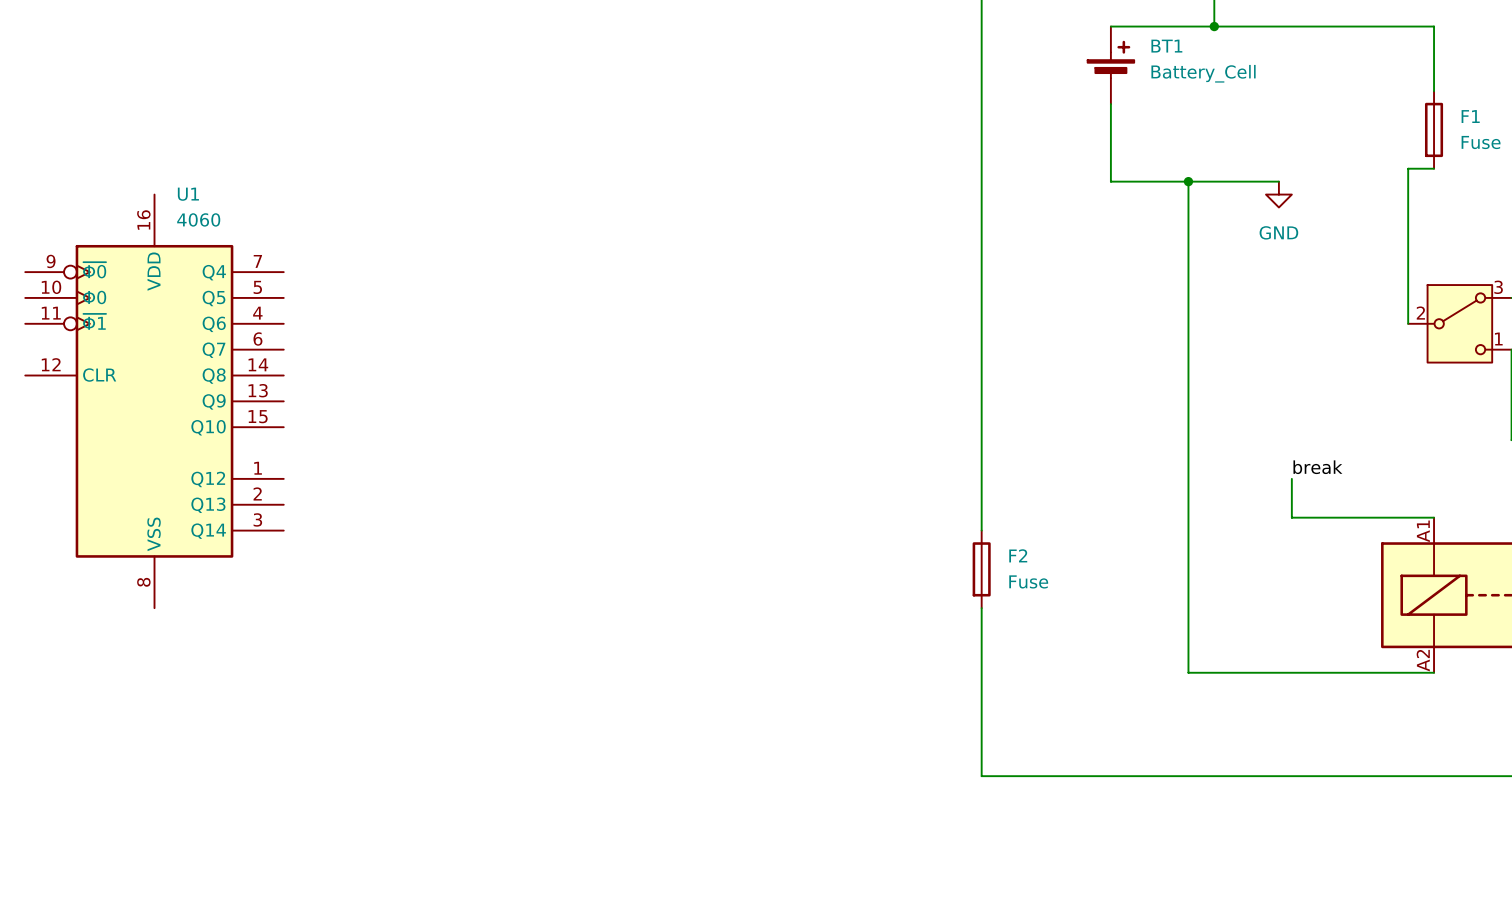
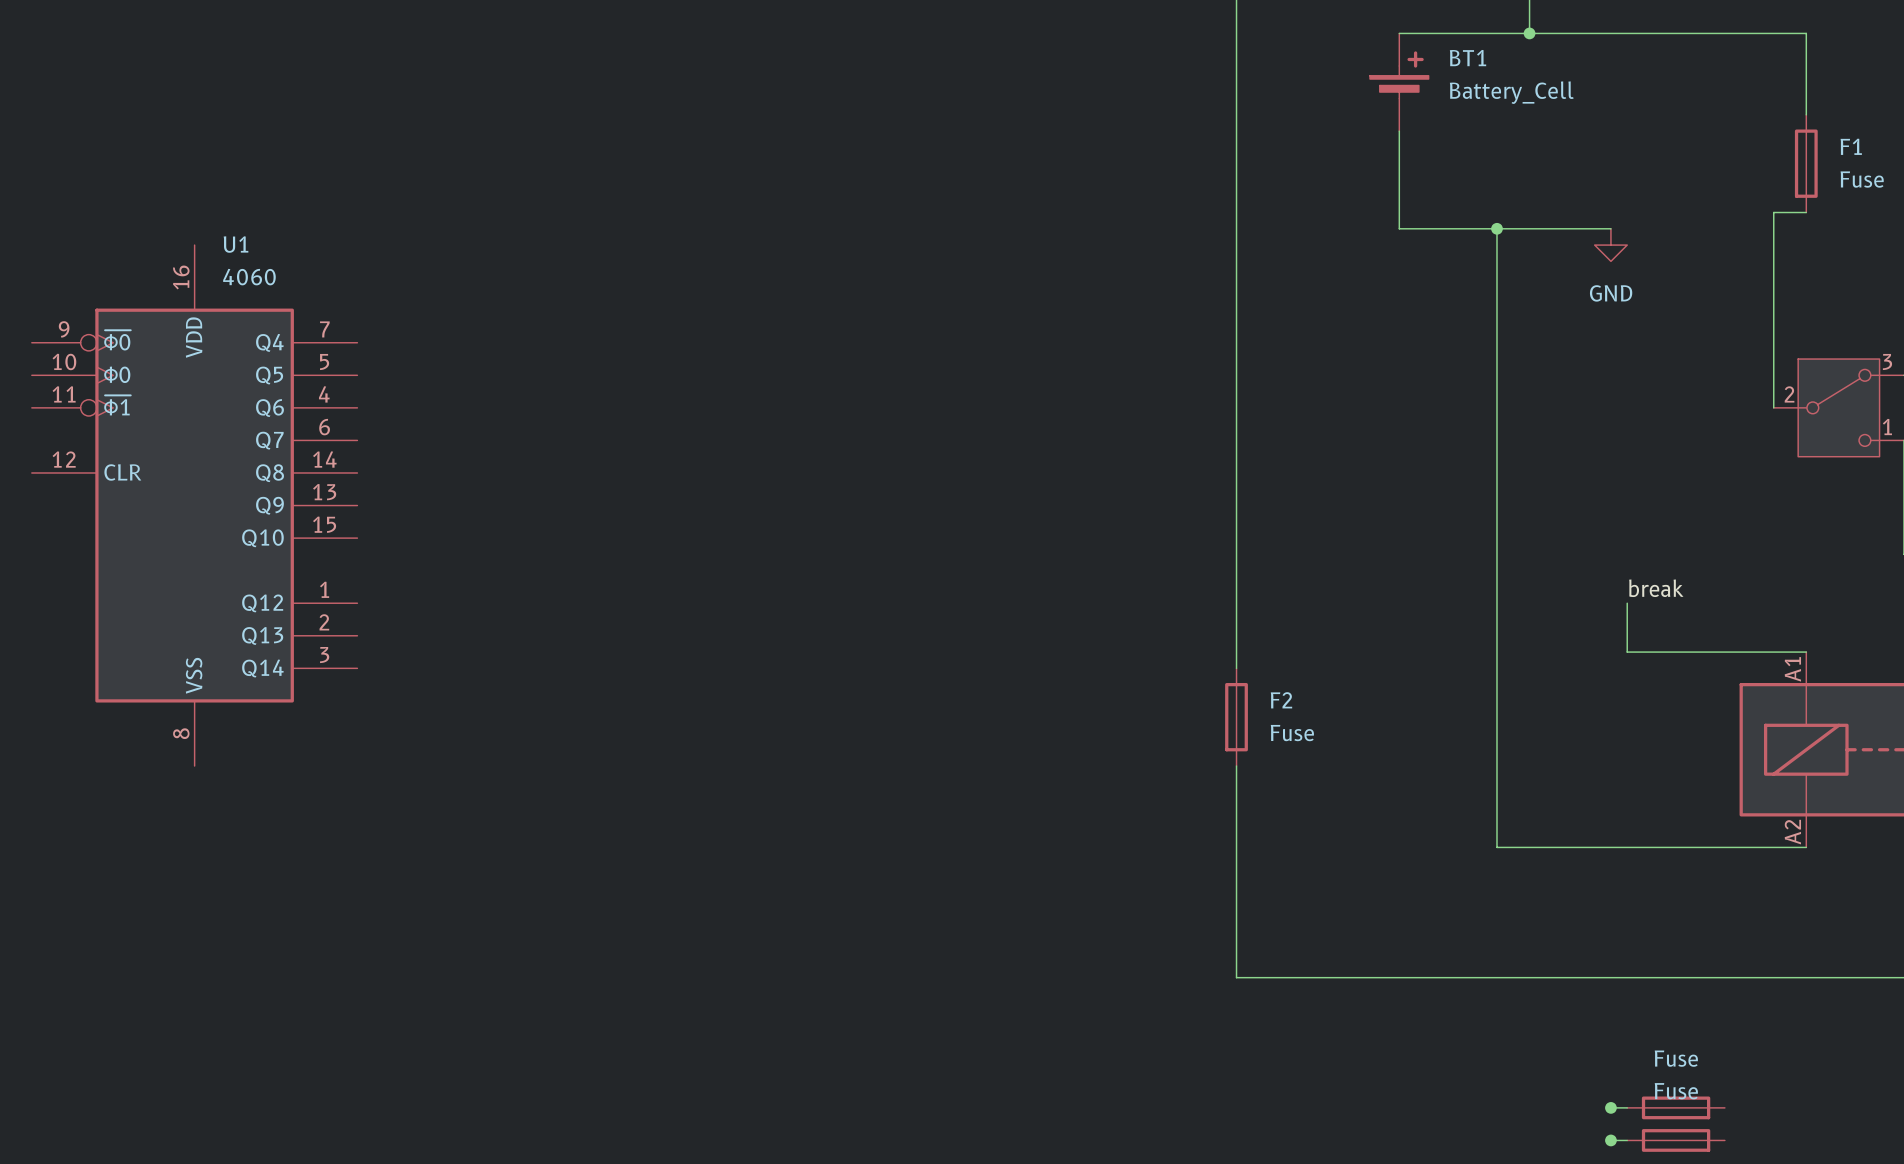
wire: none -> (1610, 1107) (1627, 1107)
junction: none -> (1610, 1107)
part: none -> Fuse (1676, 1107)
wire: none -> (1610, 1140) (1627, 1140)
junction: none -> (1610, 1140)
part: none -> Fuse (1676, 1140)

